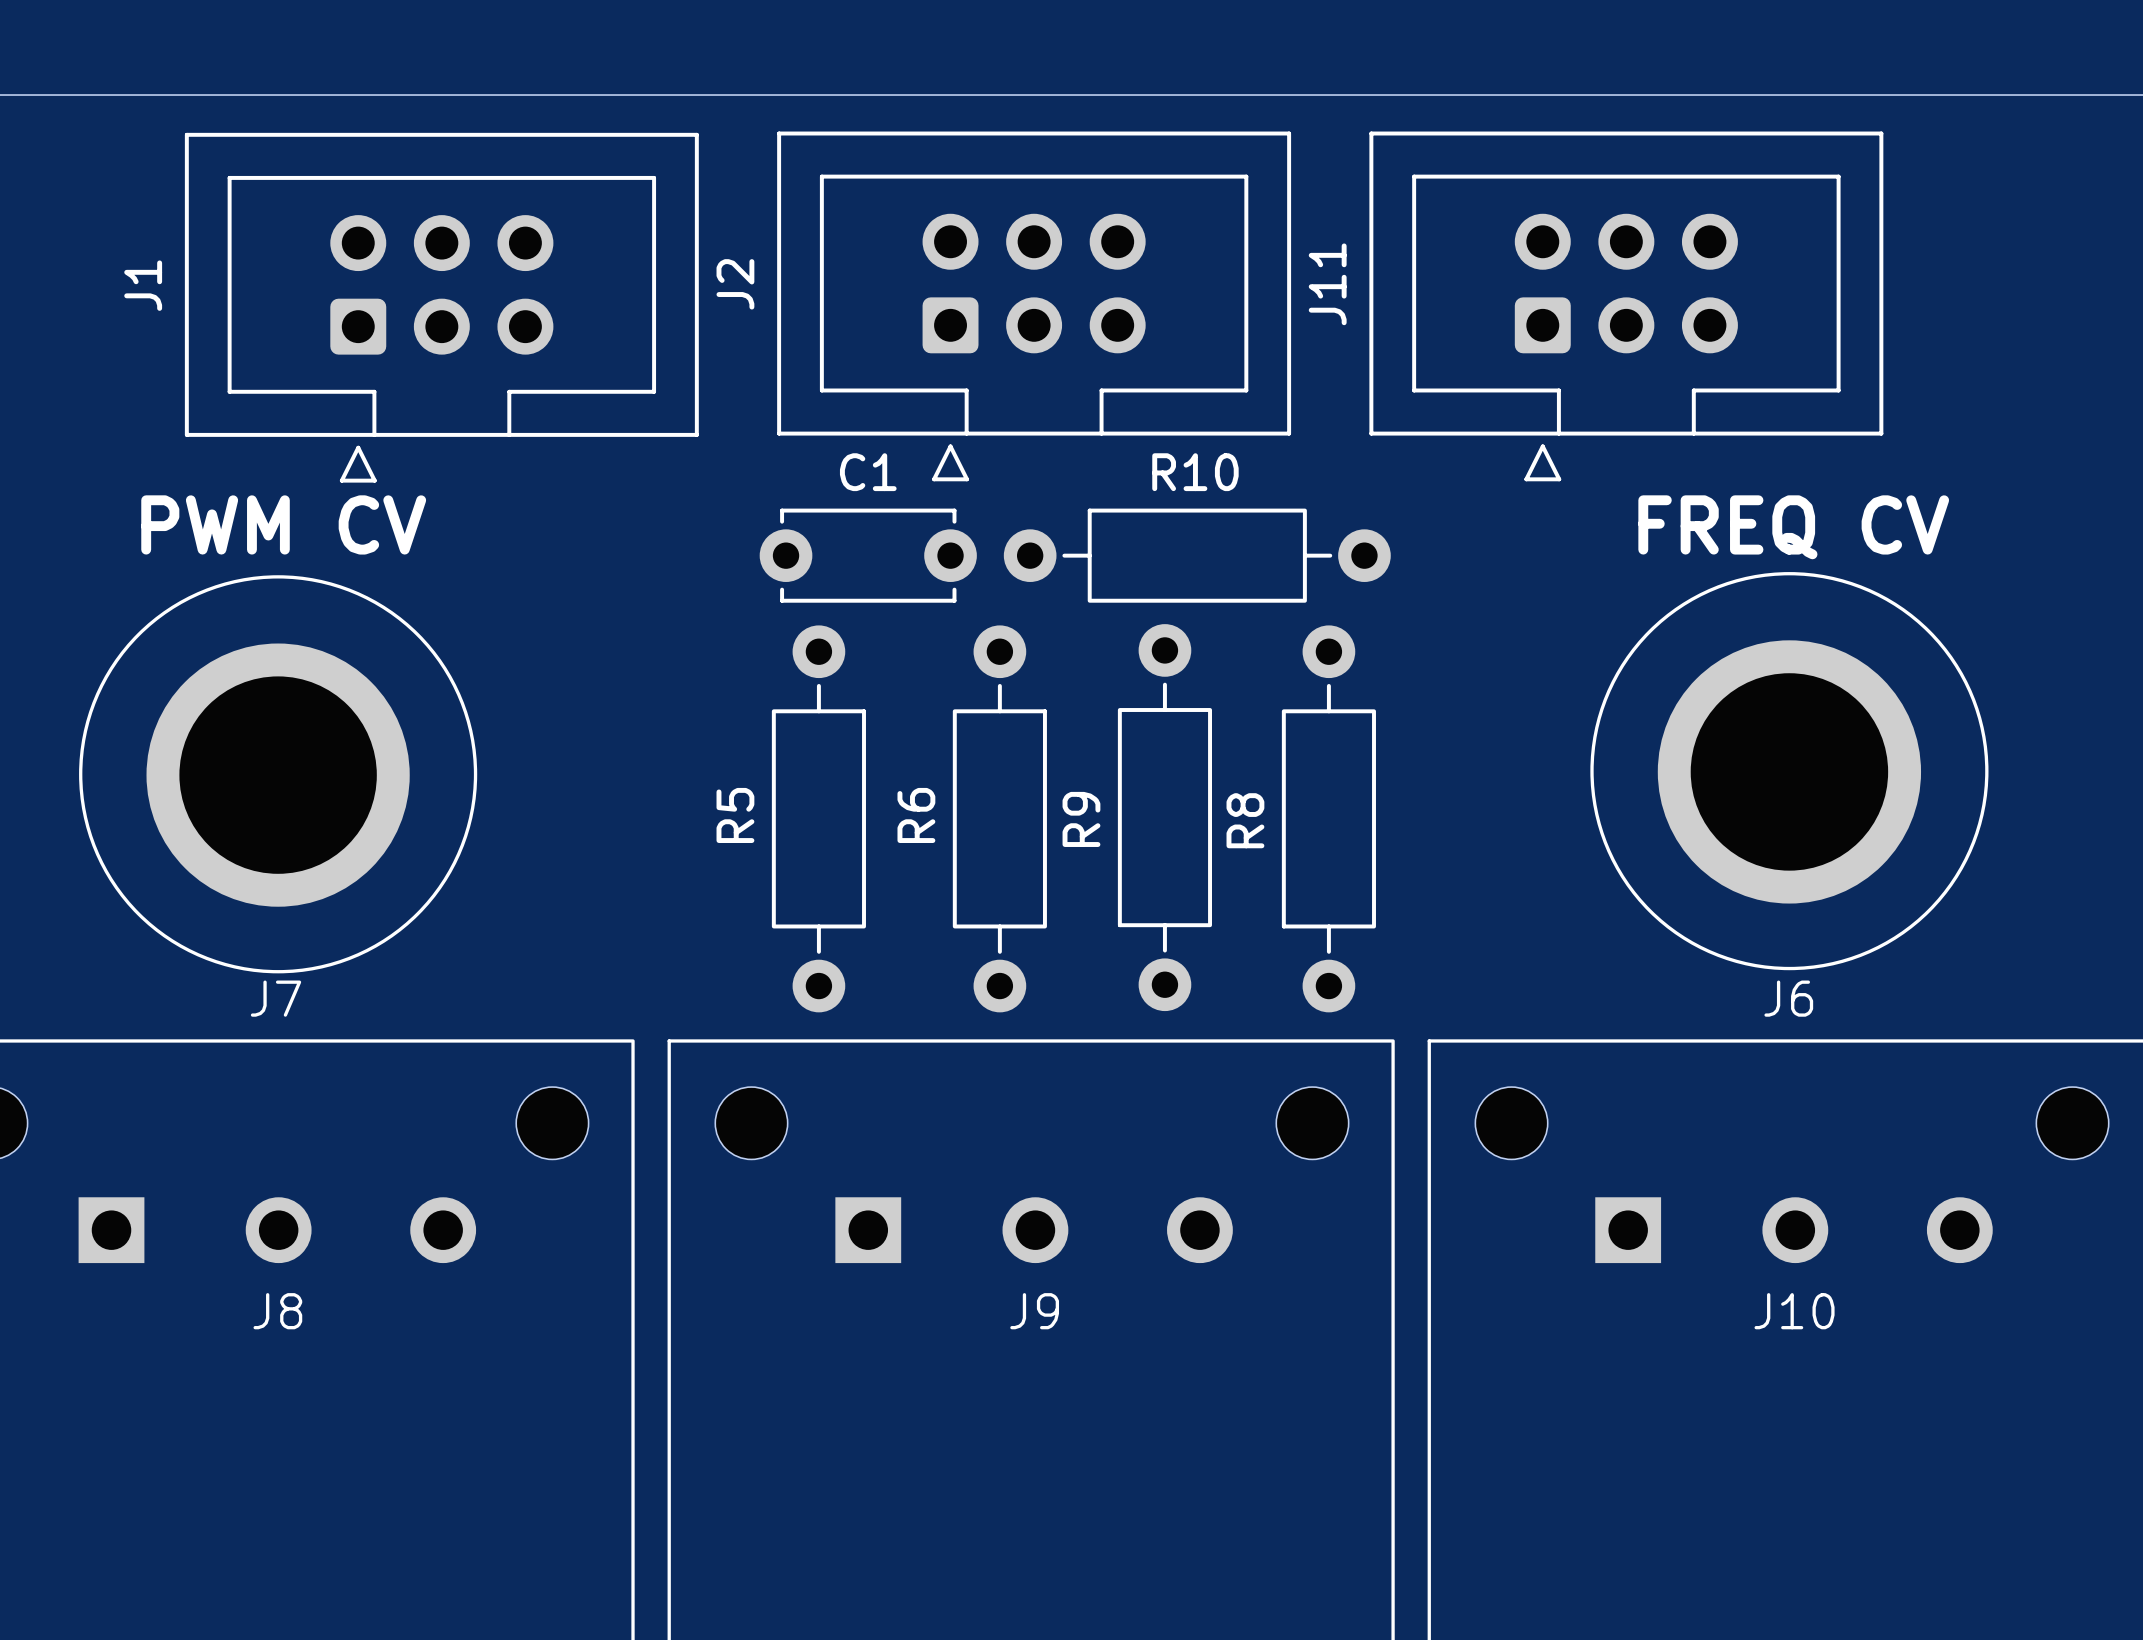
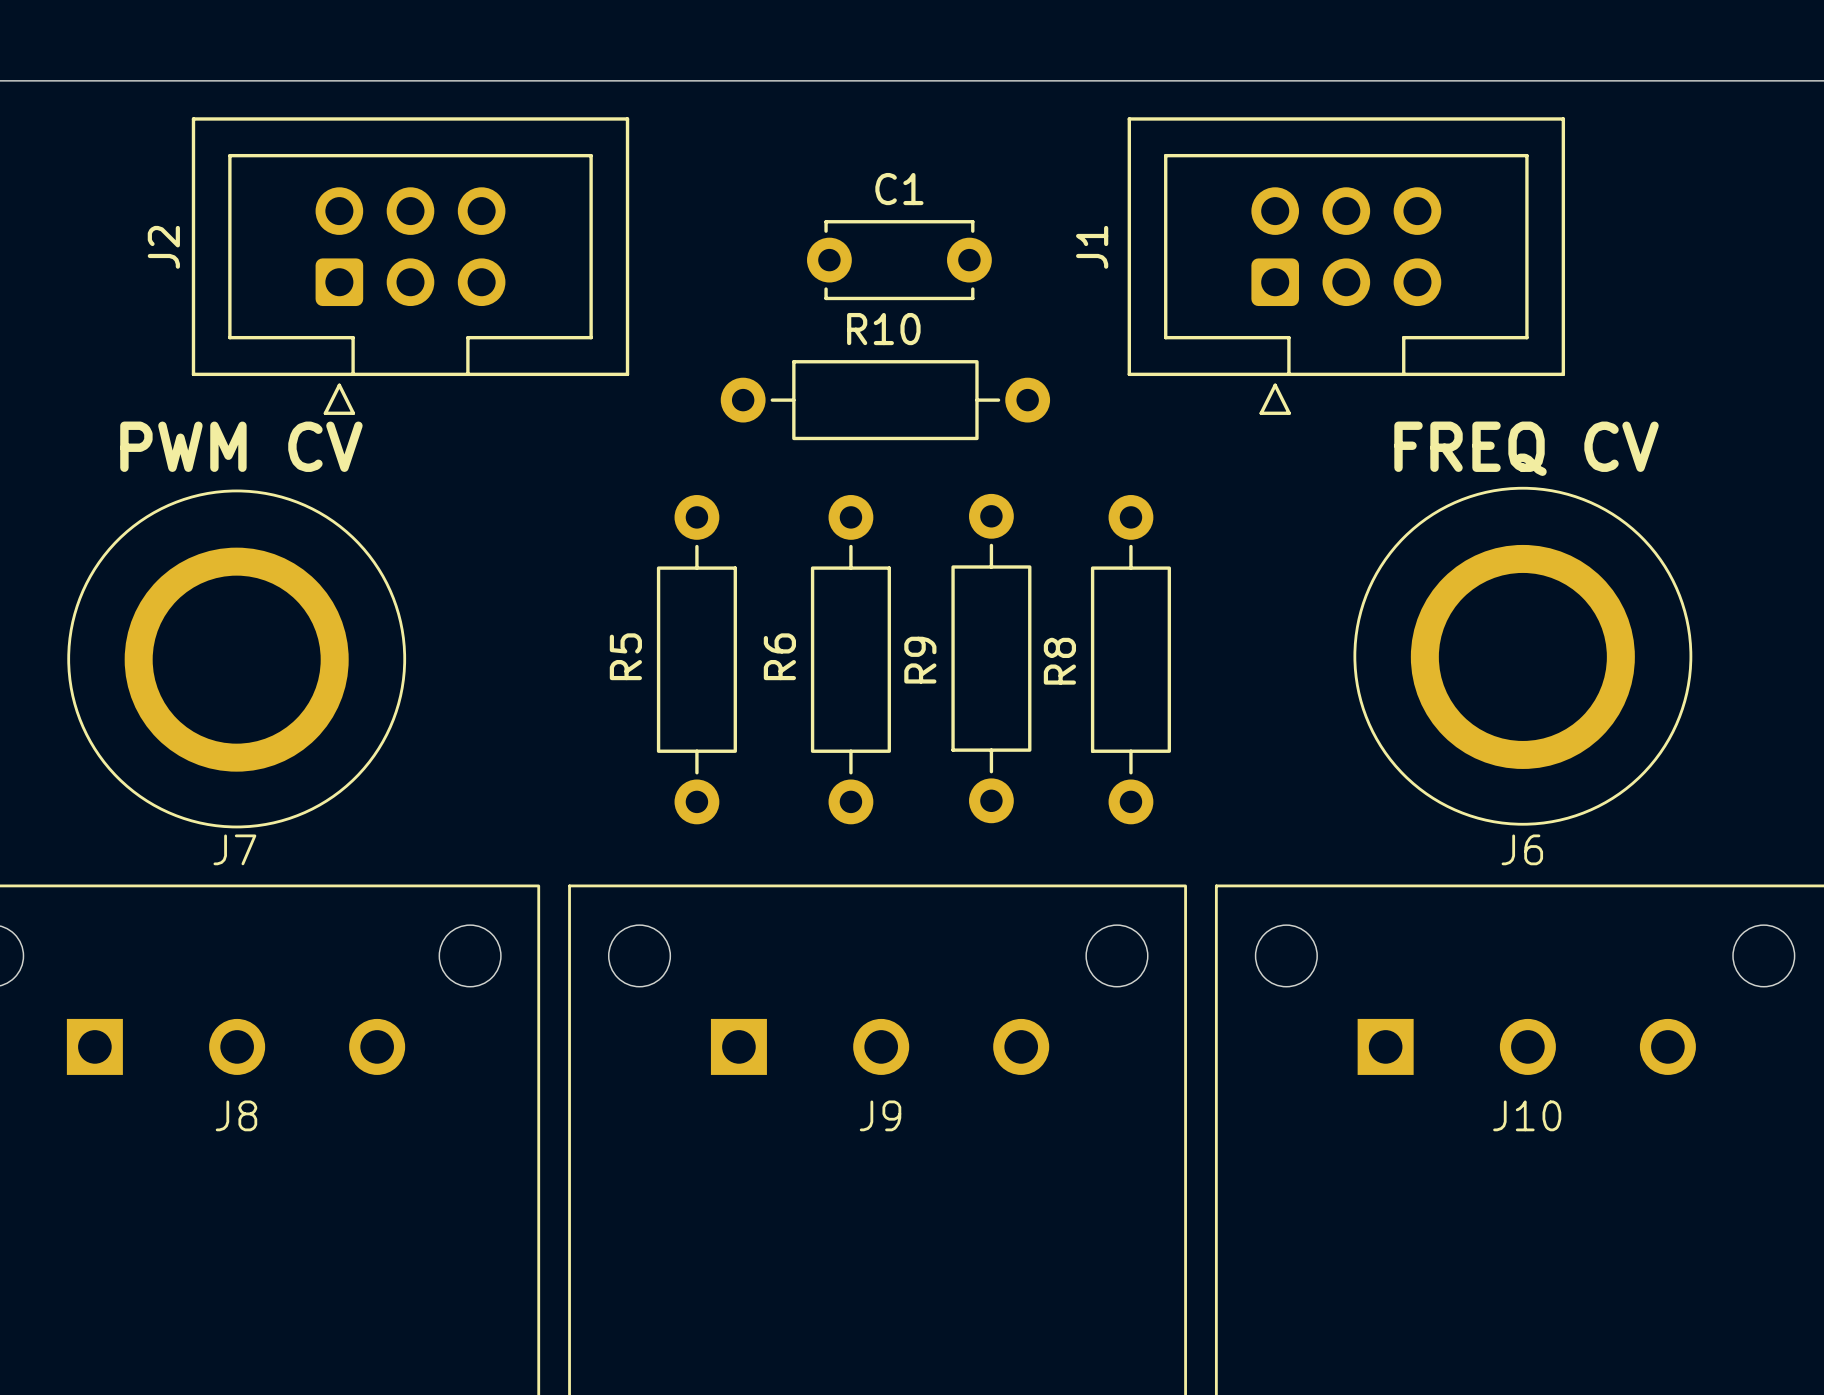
J2 name position: J2 (735, 284) -> J2 (163, 247)
J2 position: (1034, 306) -> (410, 266)
J11: (1626, 306) -> none
J1 position: (441, 307) -> (1346, 266)
C1 position: (868, 555) -> (899, 260)
R10 position: (1197, 555) -> (885, 400)
R9 position: (1164, 817) -> (991, 658)
R5 position: (818, 818) -> (696, 659)
R6 position: (999, 818) -> (850, 659)
R8 position: (1328, 818) -> (1130, 659)

